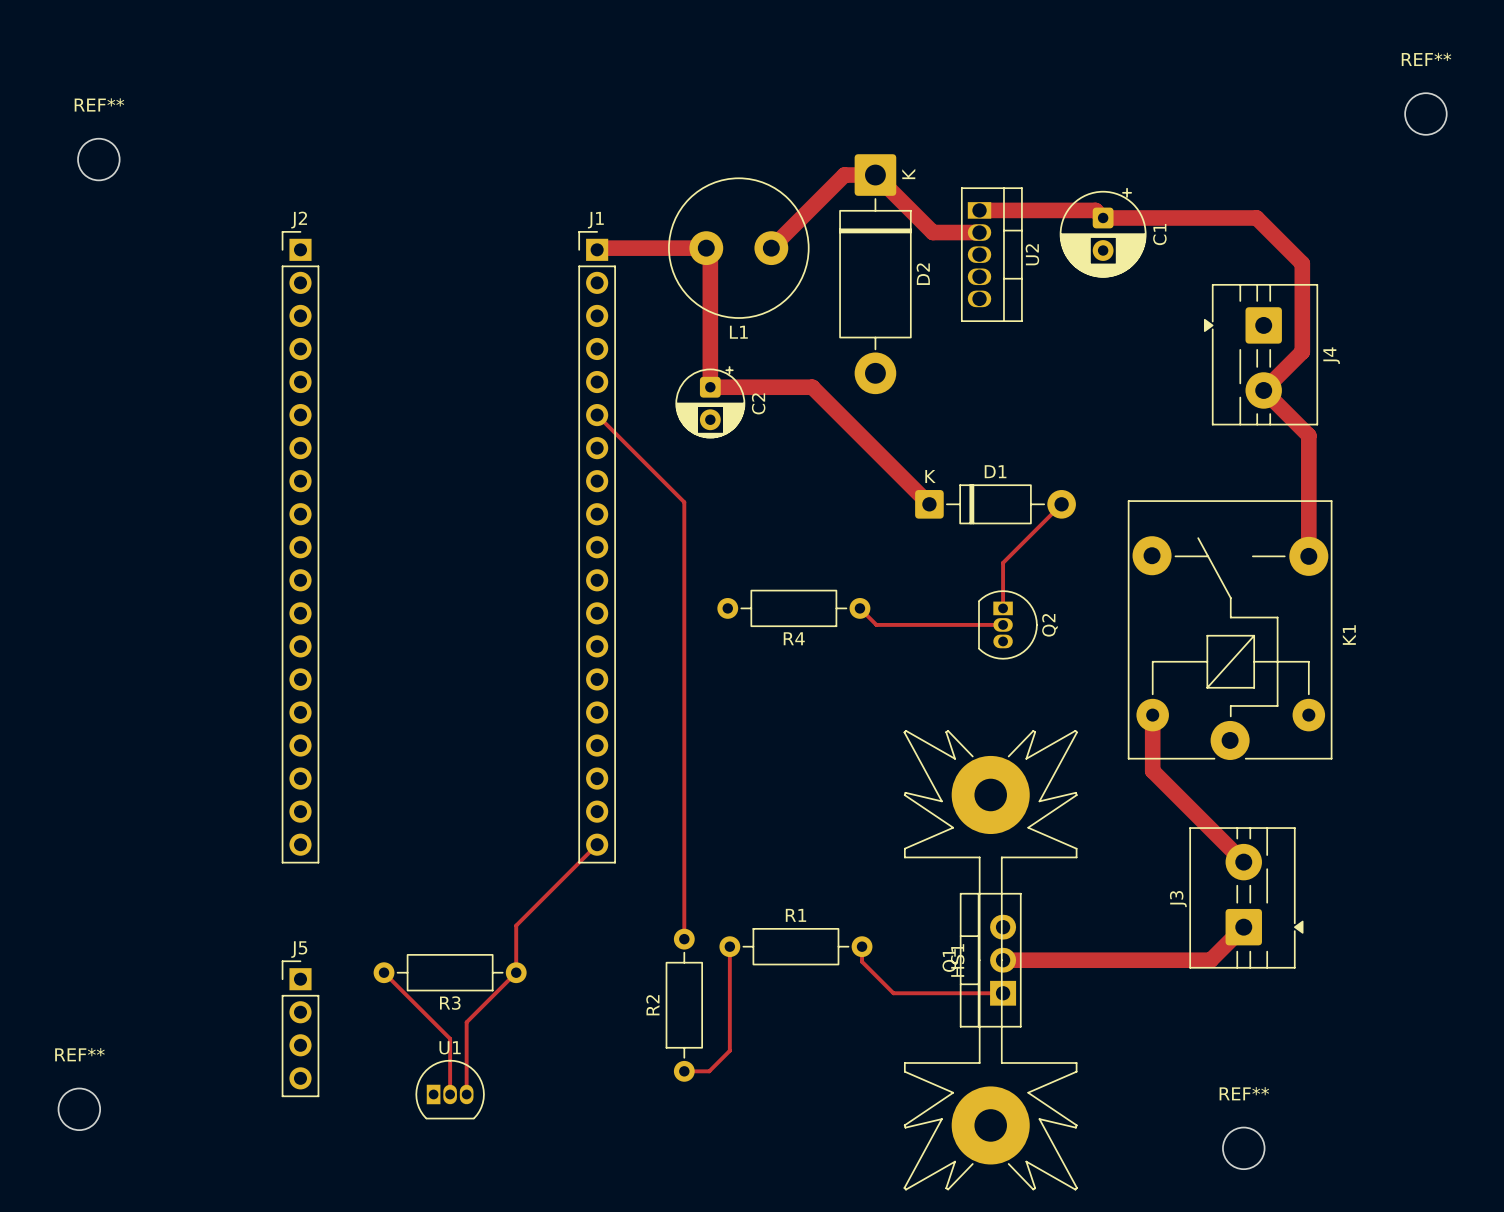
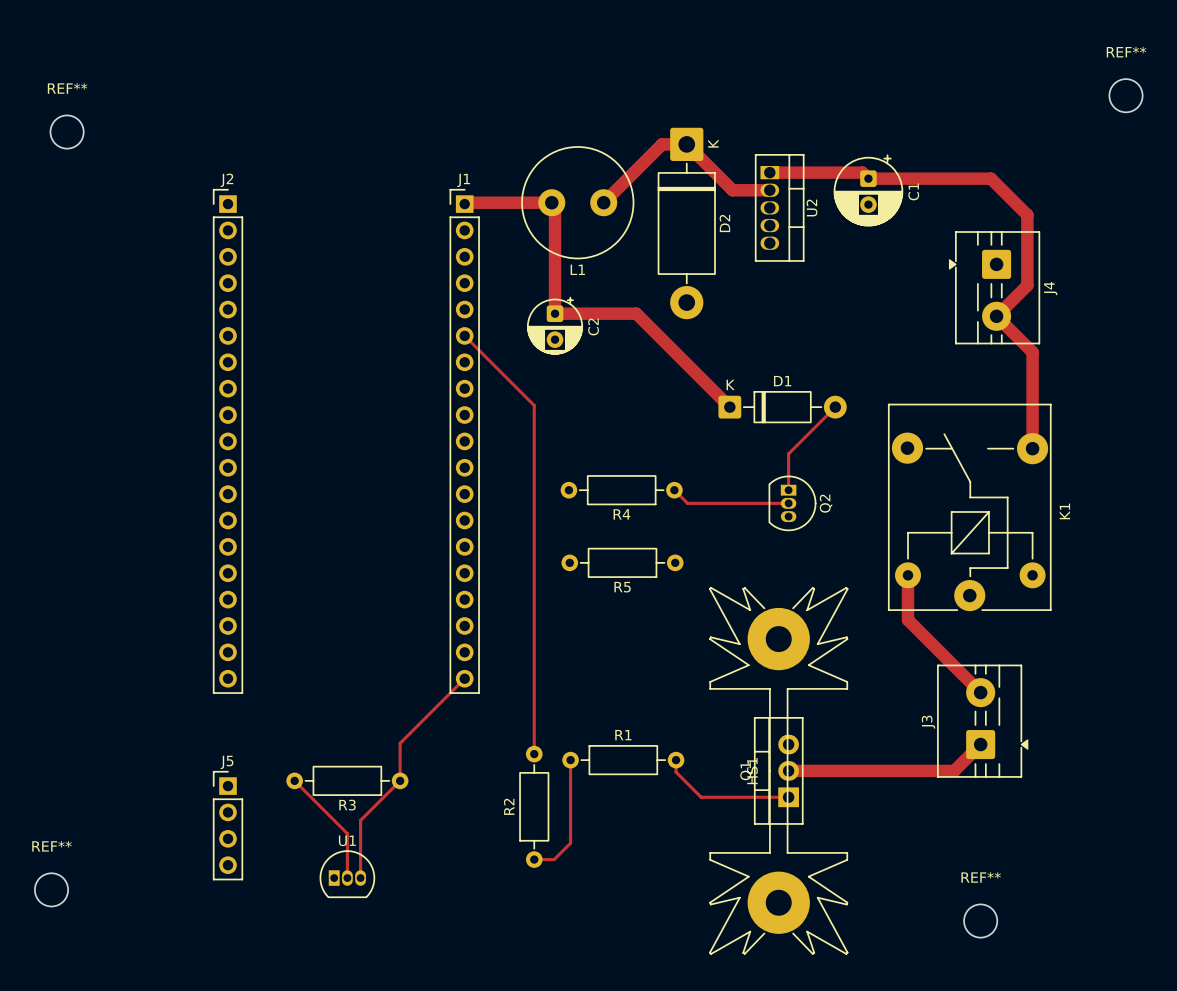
R5: none -> (622, 562)

